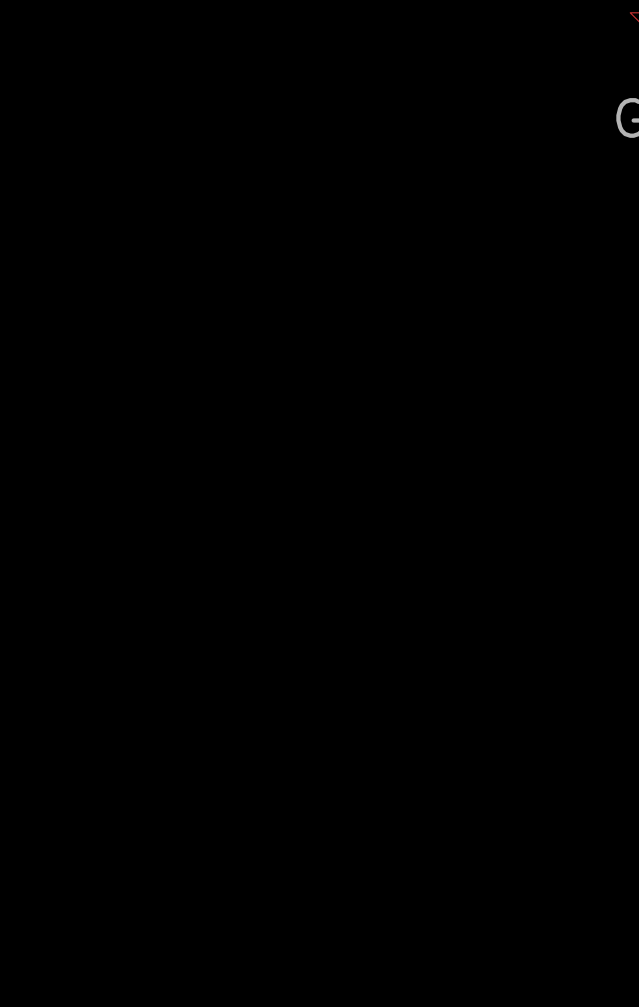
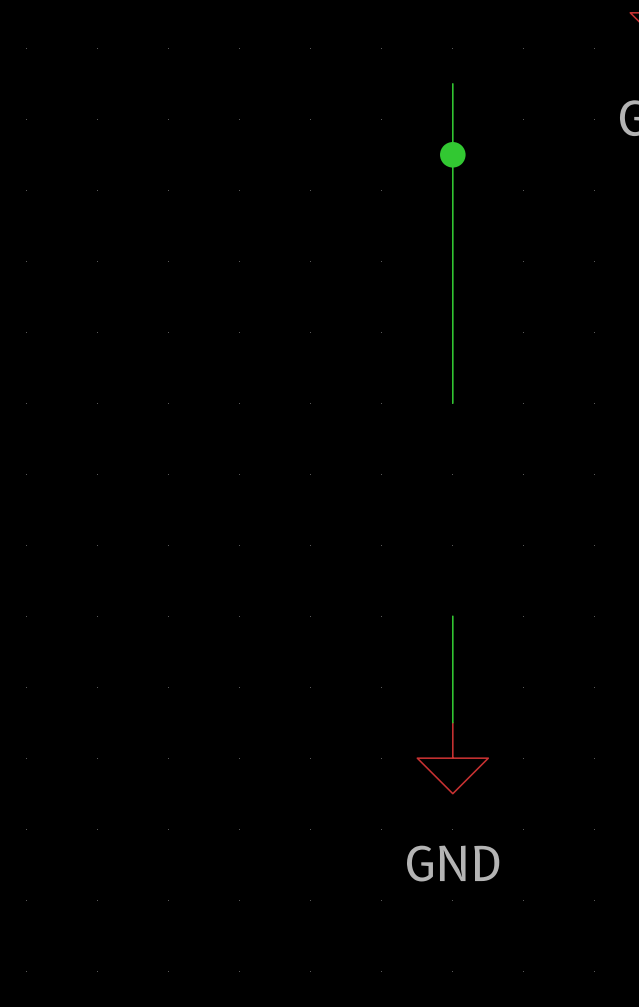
wire: none -> (452, 83) (452, 403)
junction: none -> (452, 154)
wire: none -> (452, 616) (452, 722)
power symbol: none -> GND (452, 758)

